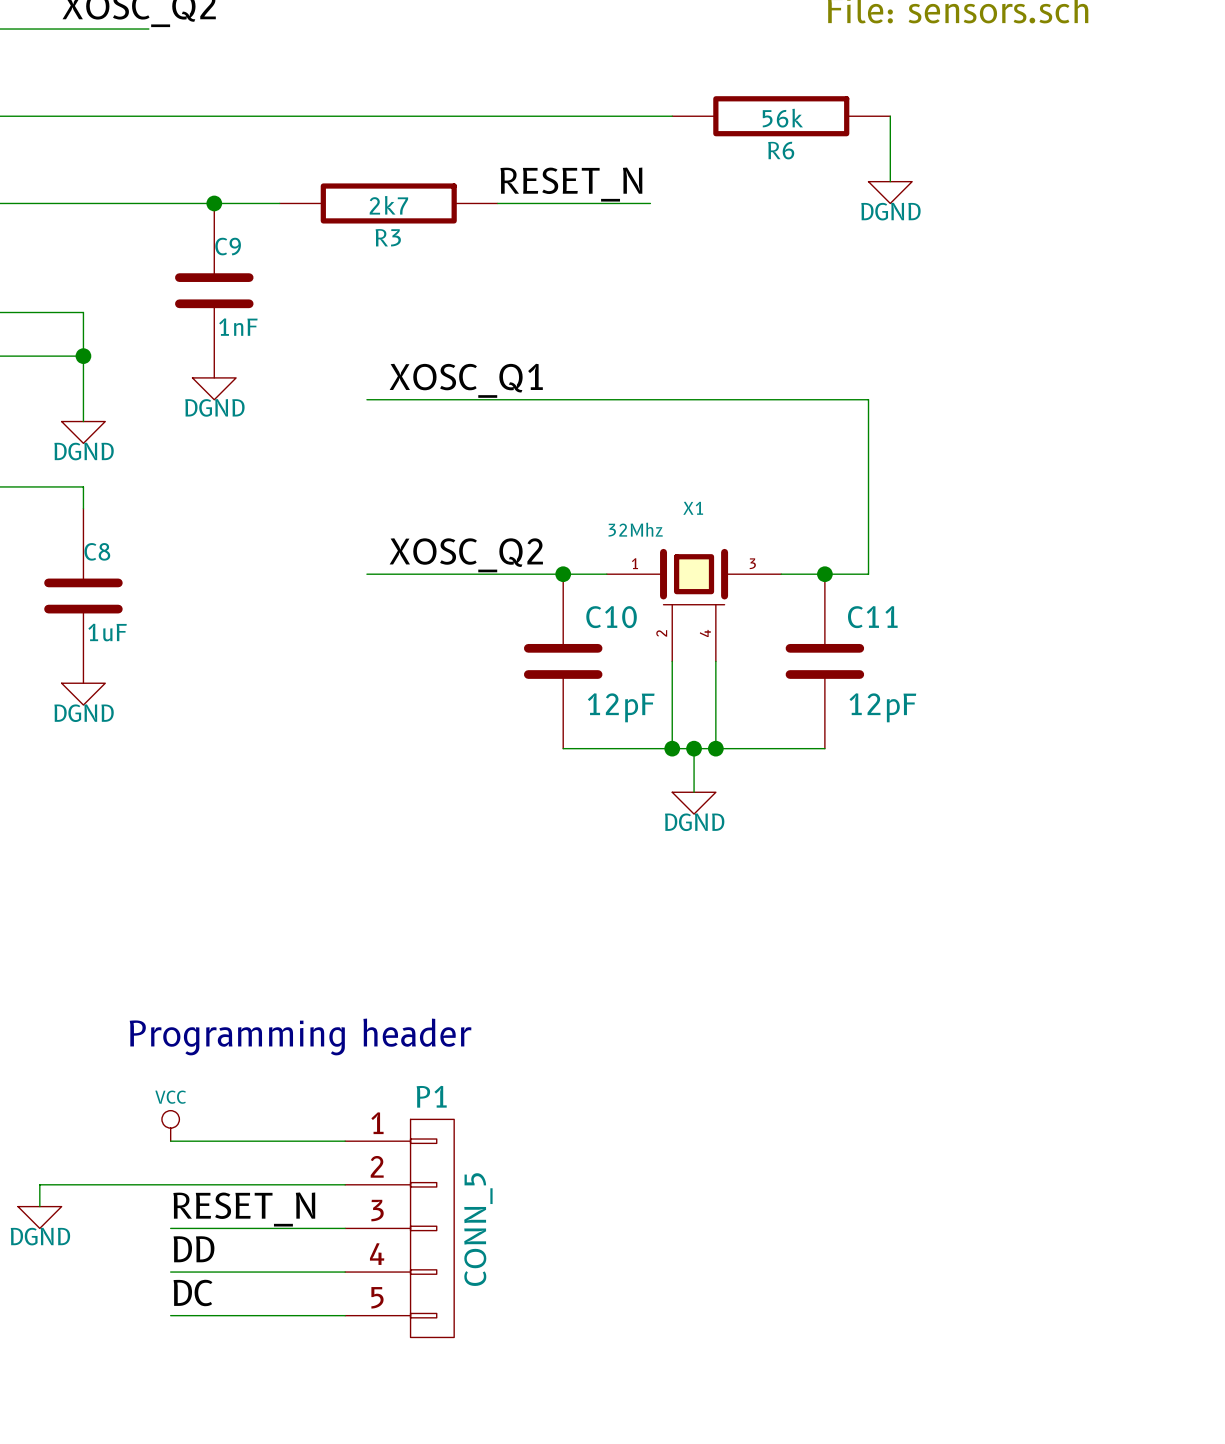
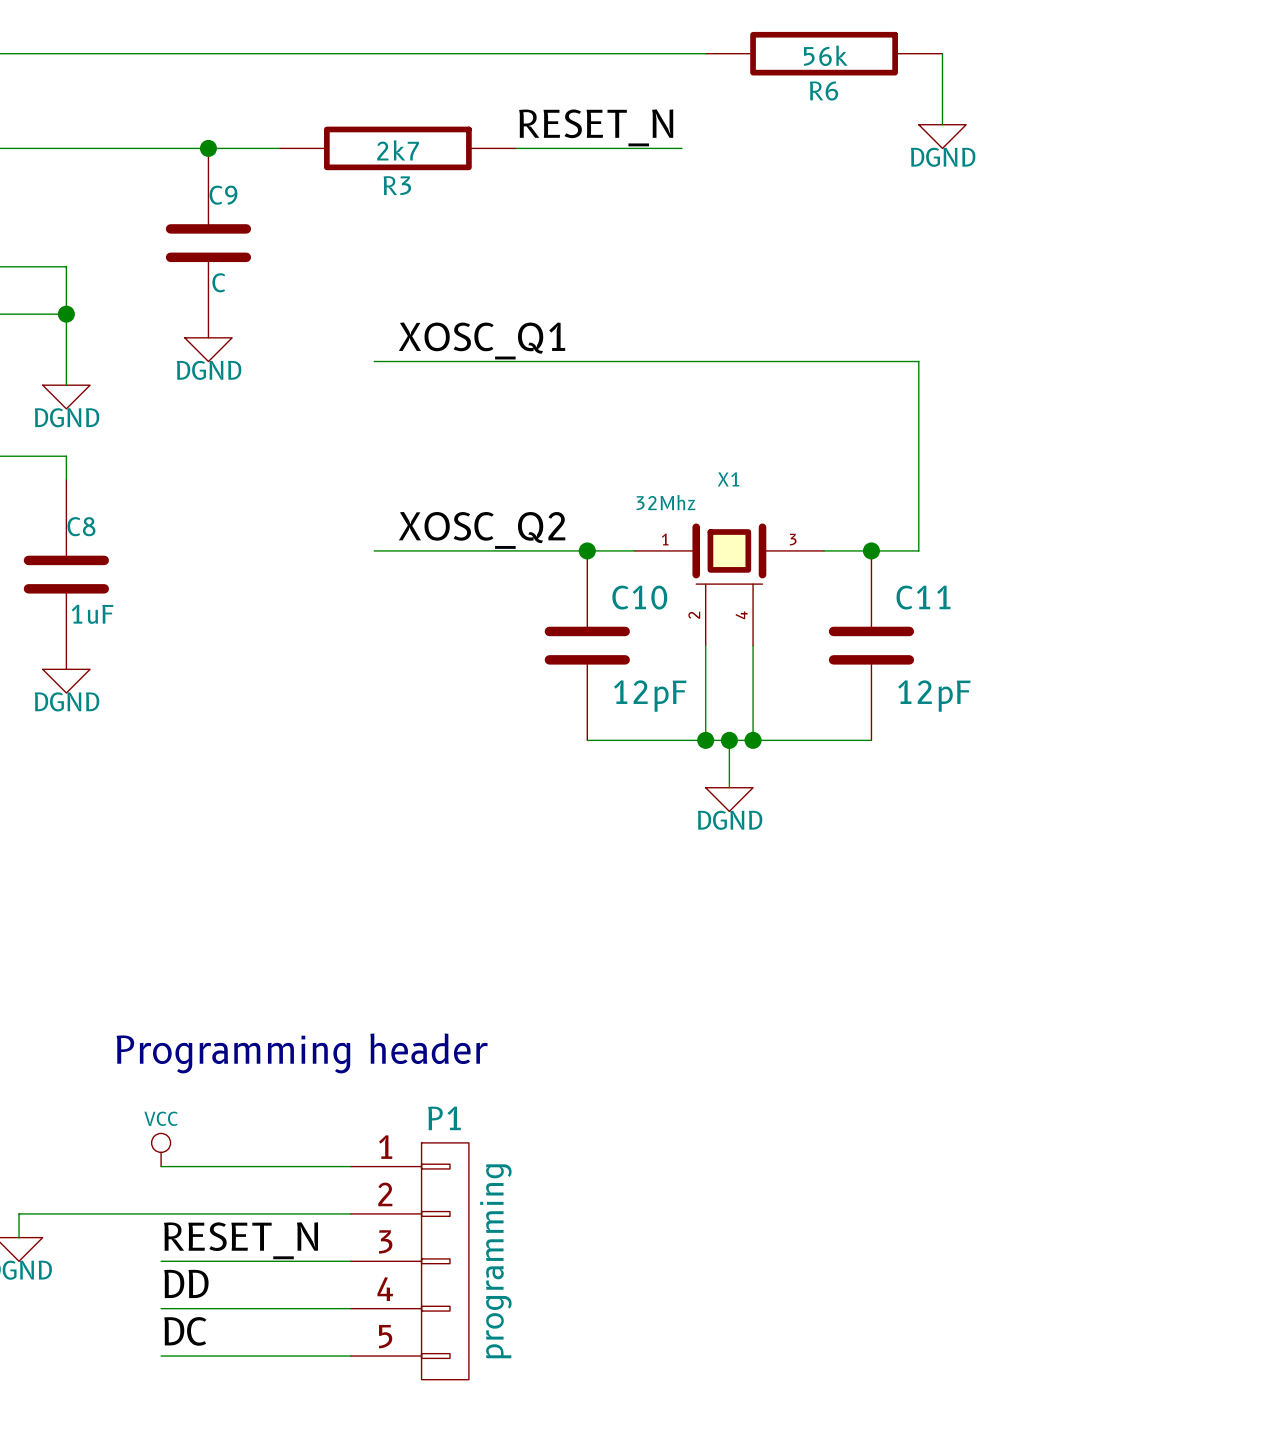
C9 value: 1nF (238, 327) -> C (218, 282)
P1 value: CONN_5 (478, 1229) -> programming (495, 1261)

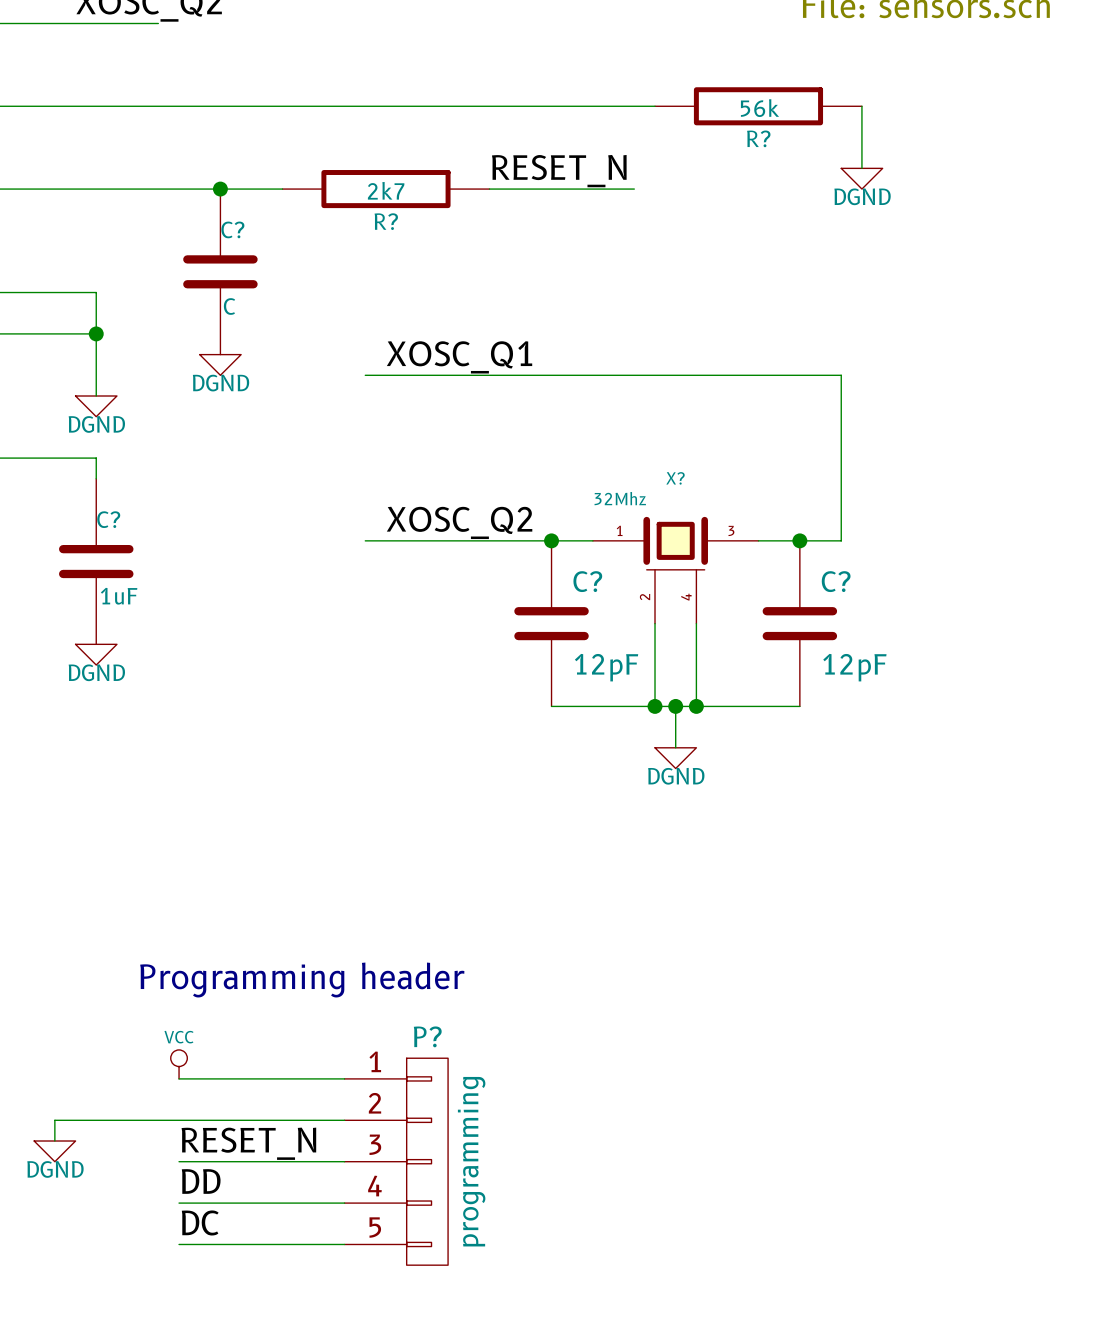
R6 name: R6 (823, 91) -> R? (758, 138)
R3 name: R3 (397, 185) -> R? (386, 221)
C9 name: C9 (223, 195) -> C? (232, 229)
X1 name: X1 (728, 479) -> X? (675, 478)
C8 name: C8 (81, 526) -> C? (108, 519)
C10 name: C10 (639, 597) -> C? (587, 581)
C11 name: C11 (923, 597) -> C? (836, 581)
P1 name: P1 (444, 1118) -> P? (427, 1036)

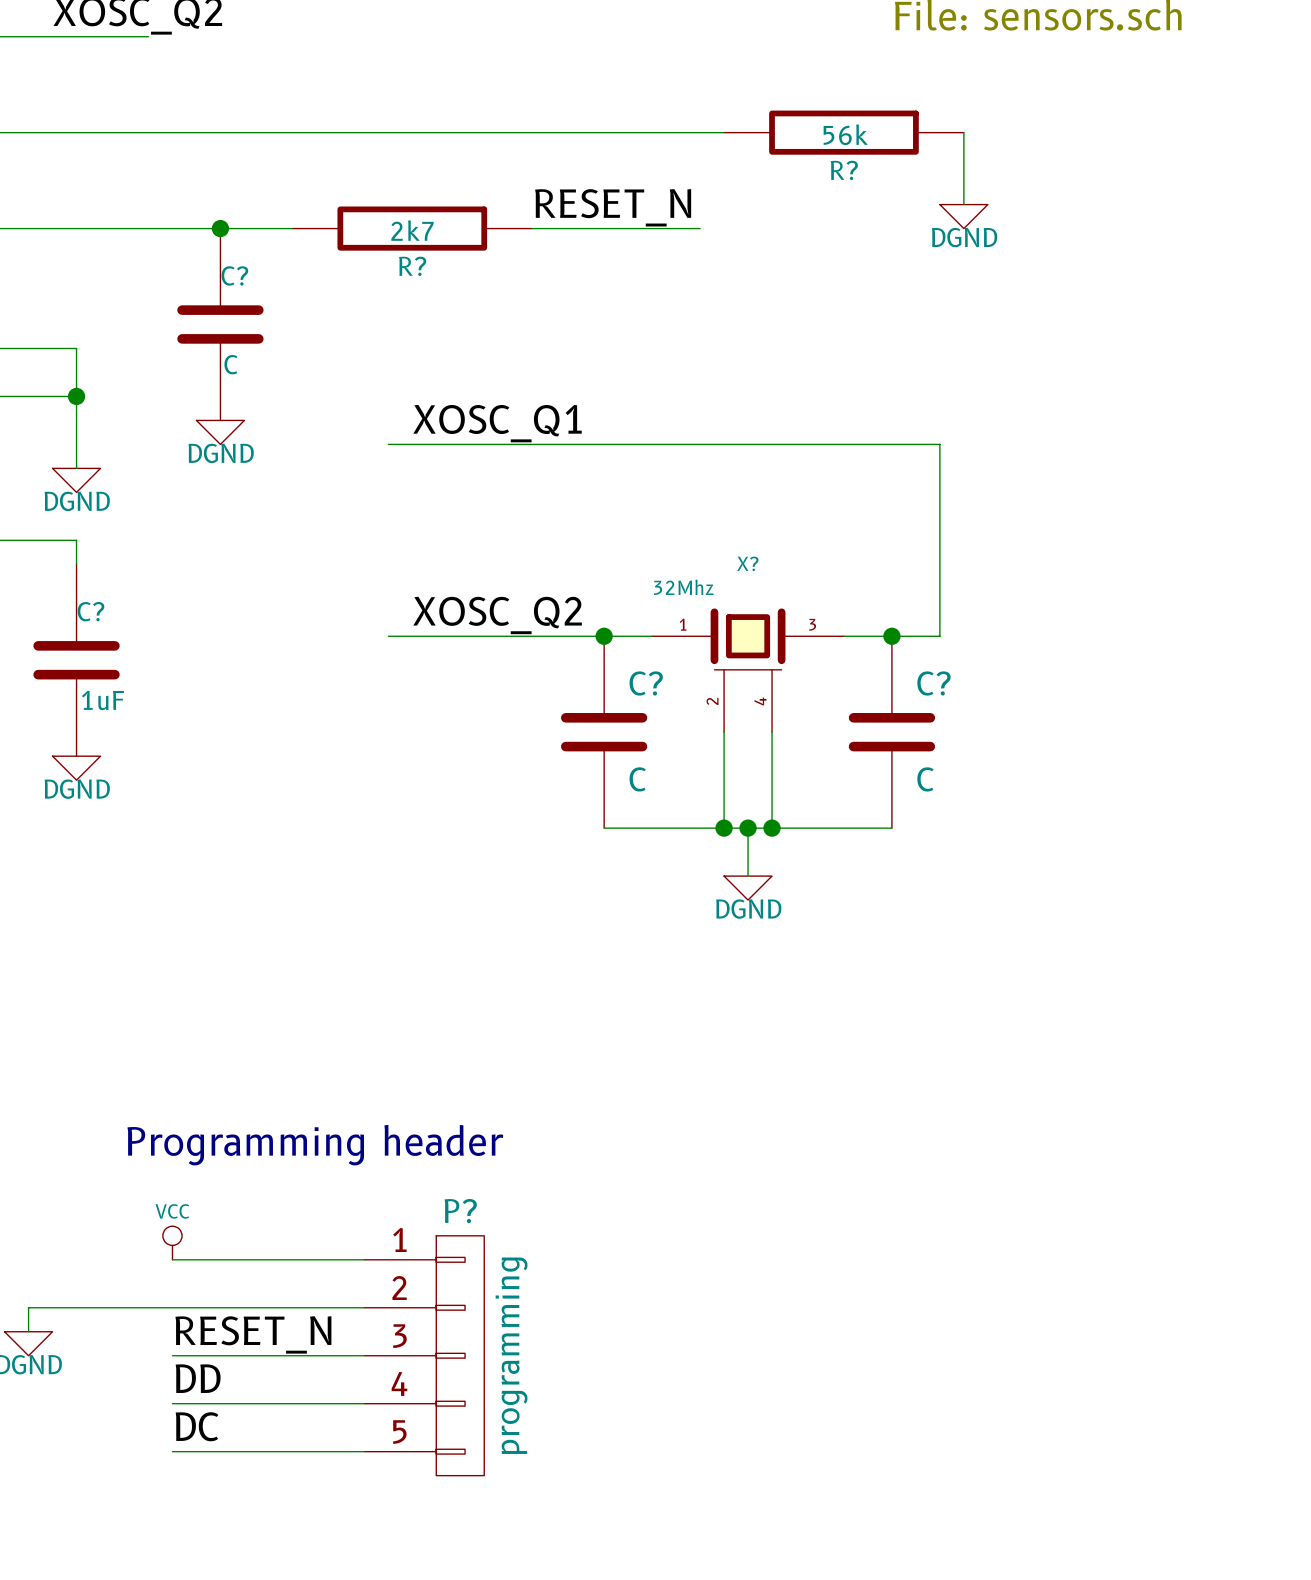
C? value: 12pF (606, 667) -> C (637, 779)
C? value: 12pF (854, 667) -> C (925, 779)

